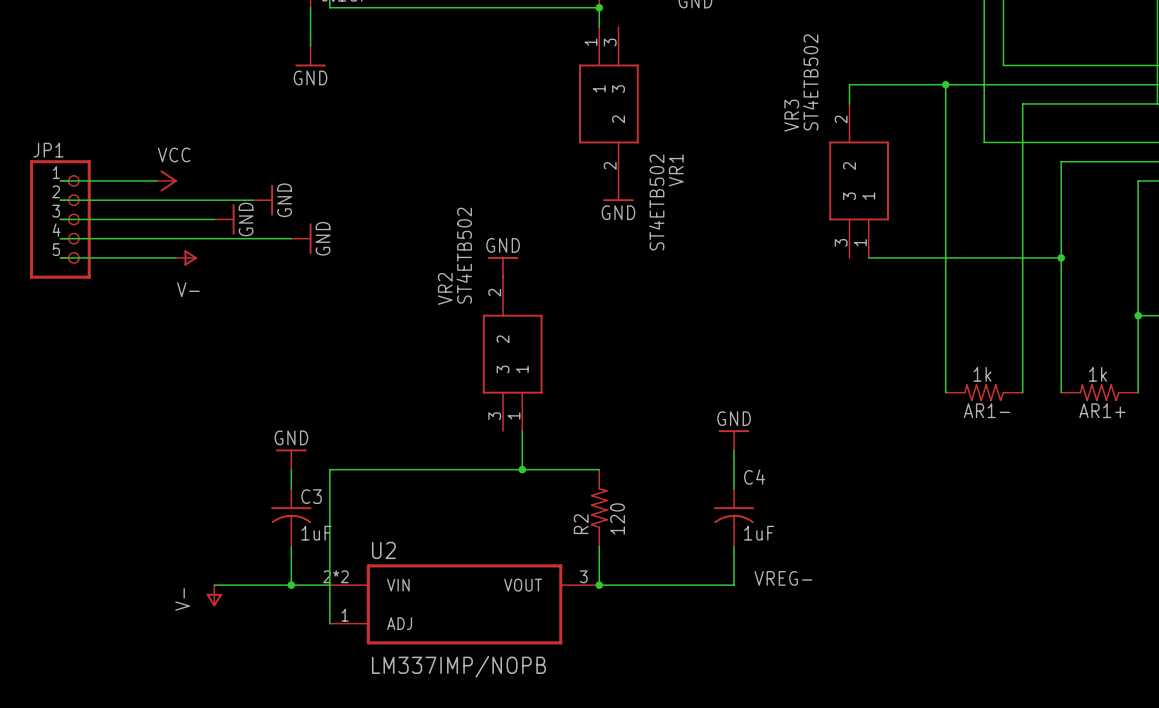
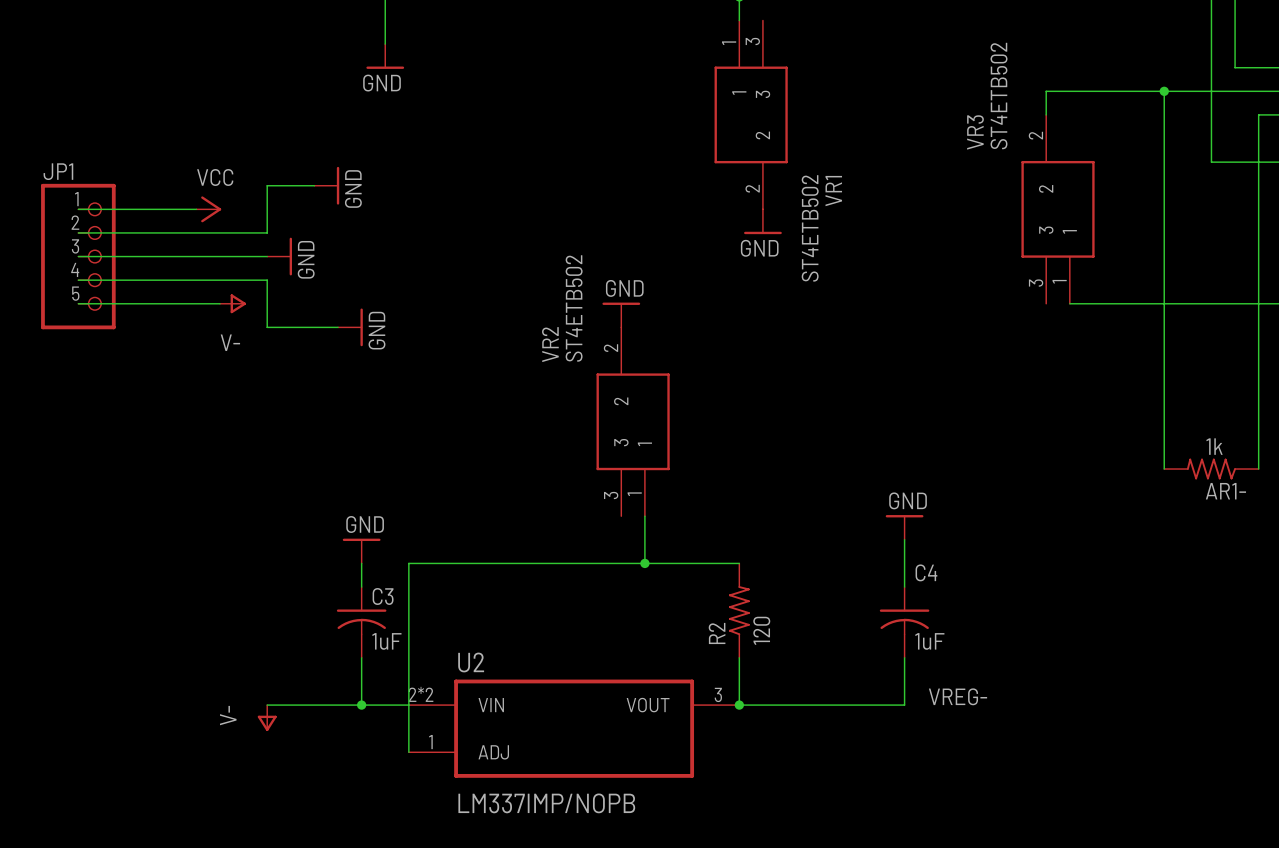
wire: (214, 200) (252, 200) -> (267, 232) (267, 185) (314, 185)
power symbol position: GND (262, 200) -> GND (326, 185)
wire: (214, 238) (291, 238) -> (267, 280) (267, 327) (338, 327)
power symbol: GND (301, 238) -> none
power symbol: none -> GND (350, 327)

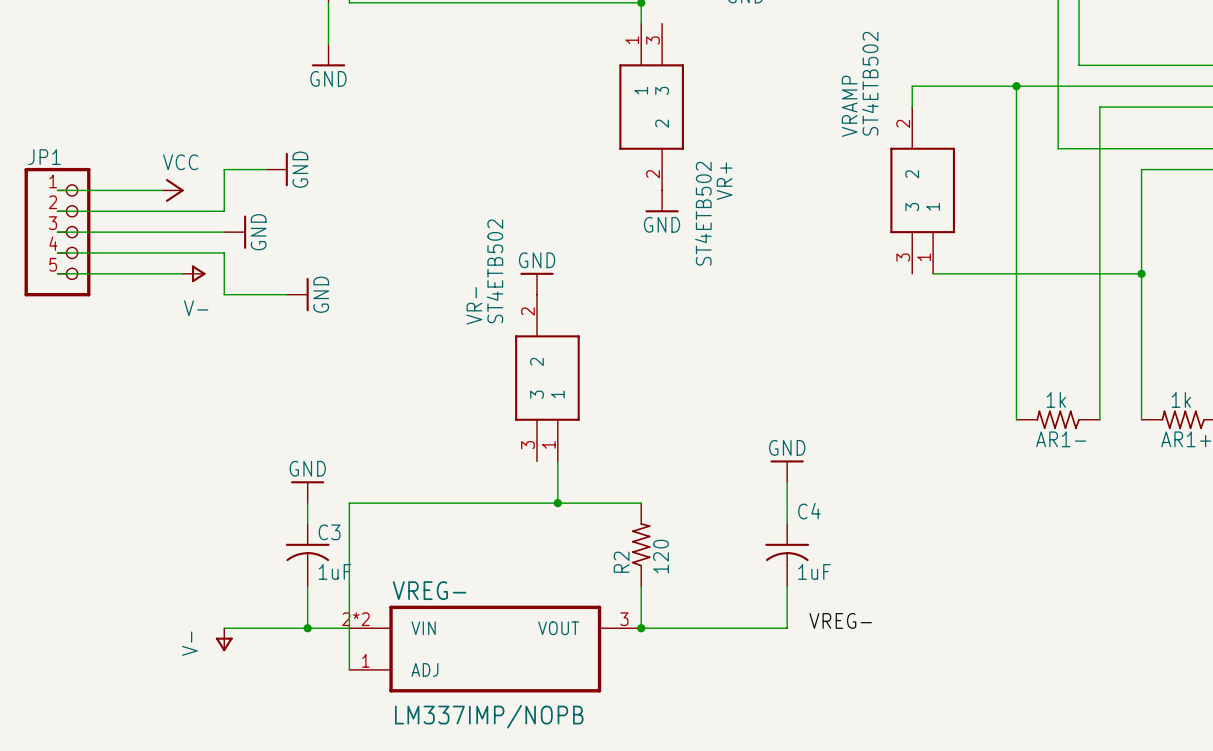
VR3 name: VR3 (975, 132) -> VRAMP (849, 106)
VR1 name: VR1 (833, 191) -> VR+ (724, 181)
VR2 name: VR2 (550, 344) -> VR- (474, 305)
U2 name: U2 (471, 662) -> VREG- (429, 590)

